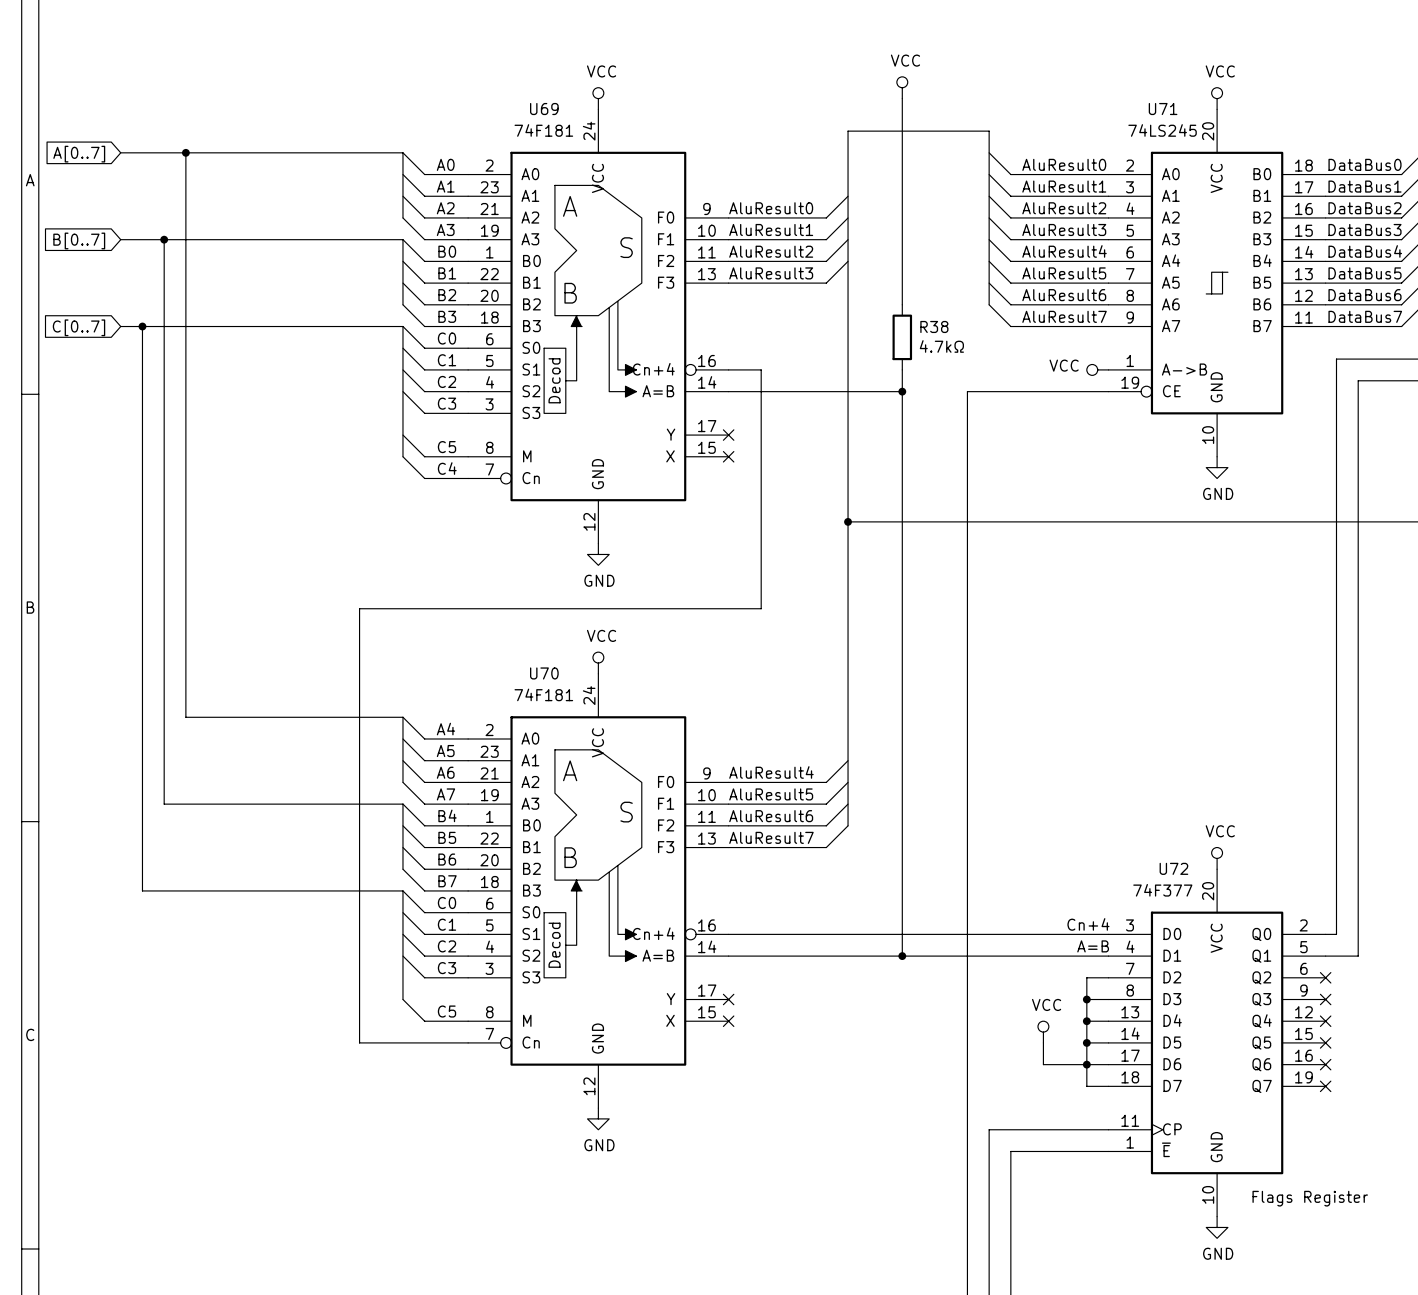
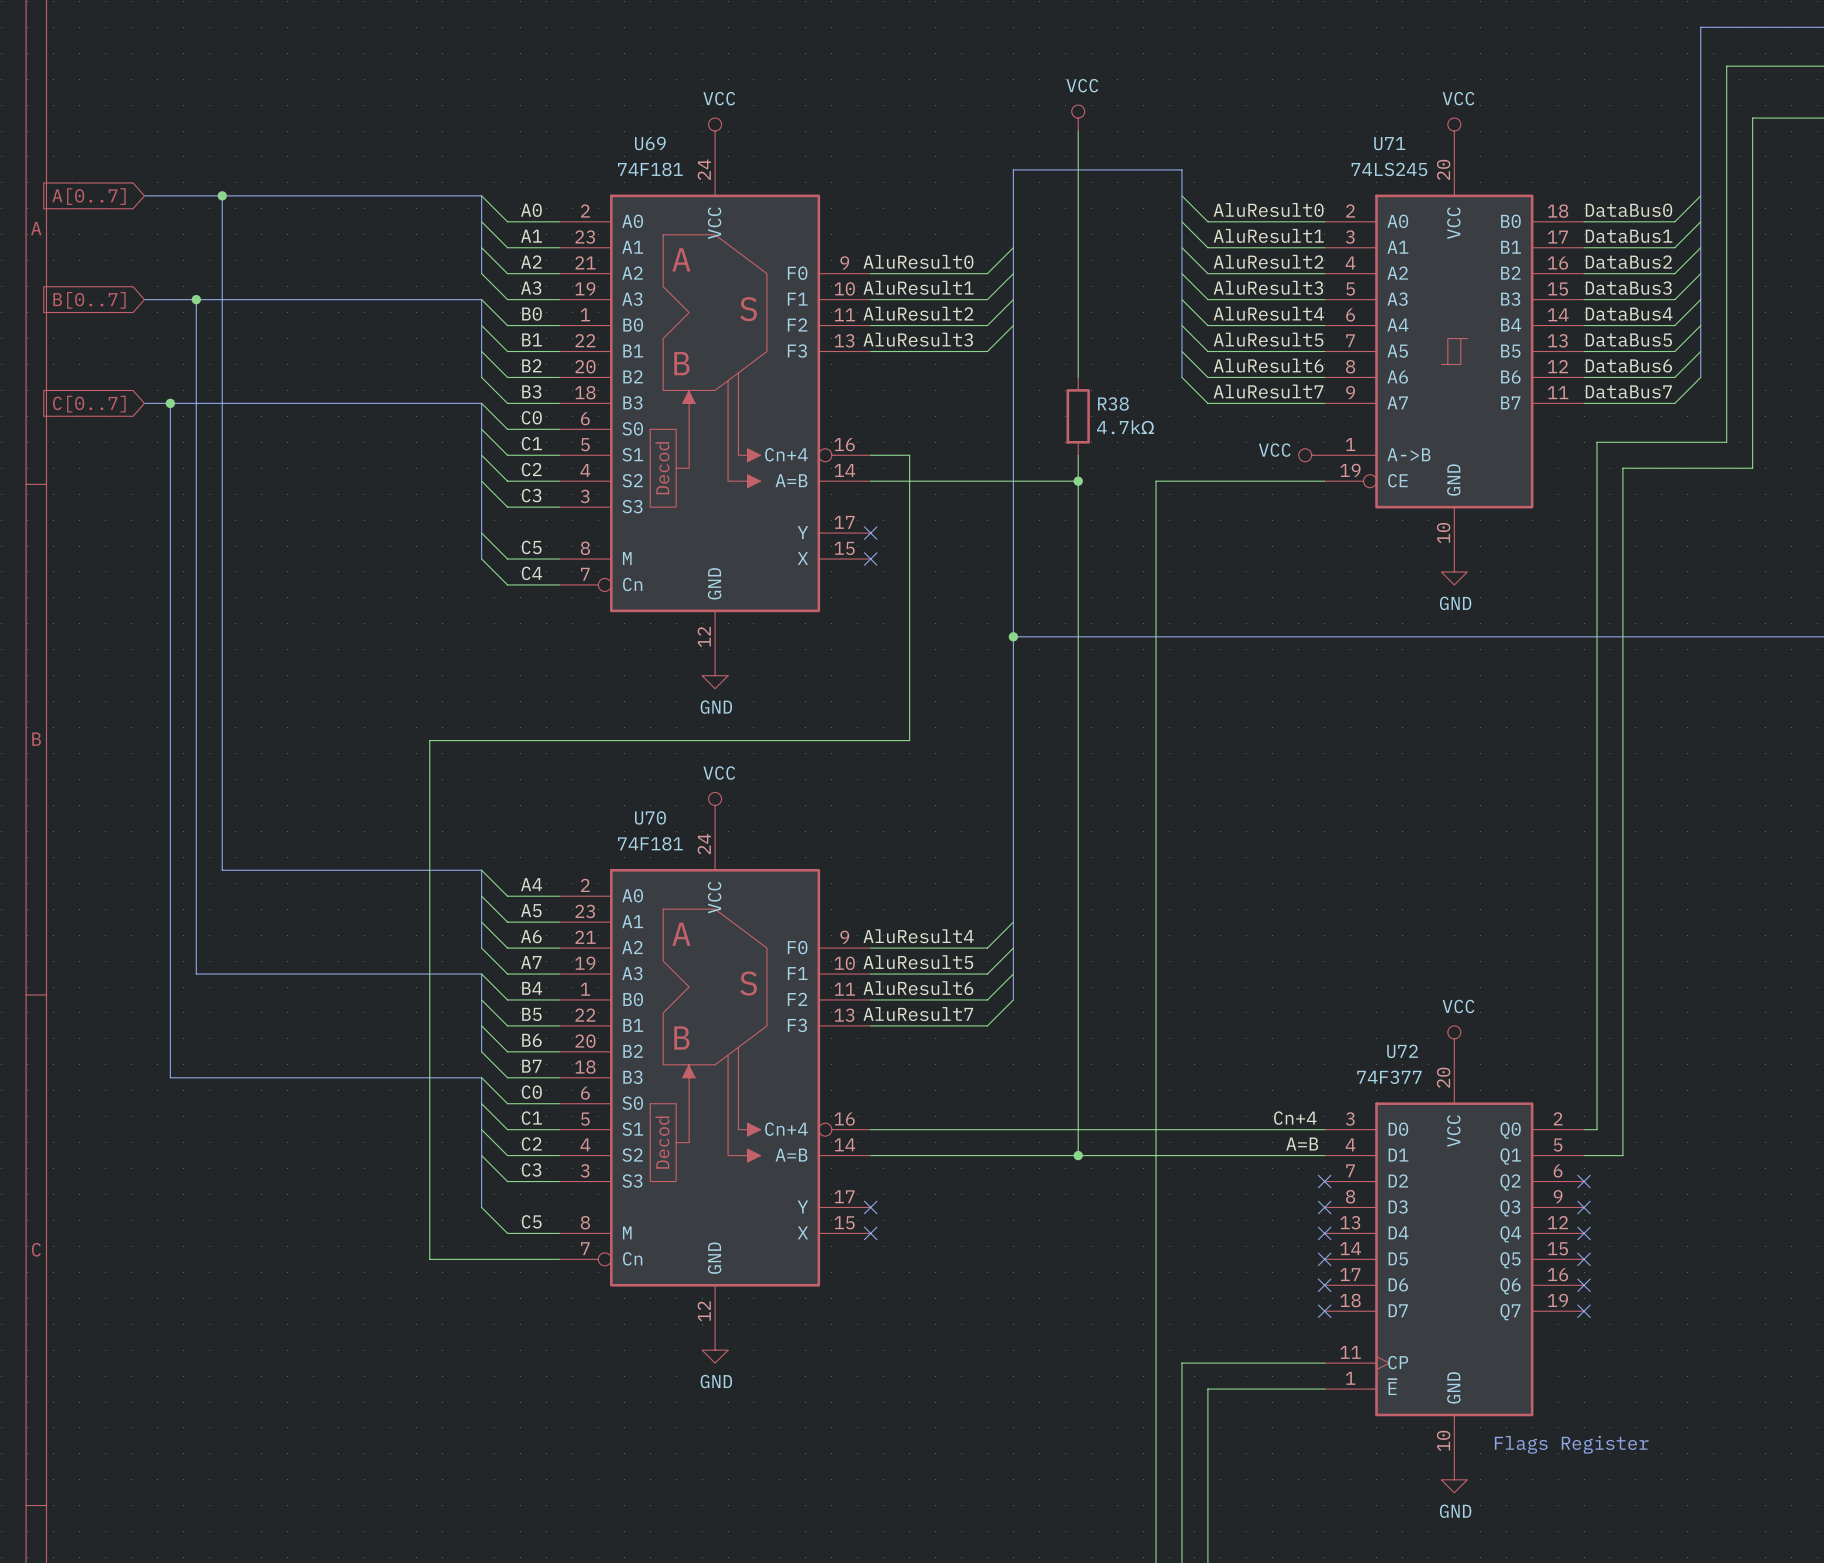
wire: (1108, 977) (1086, 977) (1086, 1086) (1108, 1086) -> none
no-connect mark: none -> (1324, 1181)
wire: (1086, 999) (1108, 999) -> none
junction: (1086, 999) -> none
no-connect mark: none -> (1324, 1207)
wire: (1086, 1021) (1108, 1021) -> none
junction: (1086, 1021) -> none
no-connect mark: none -> (1324, 1233)
power symbol: VCC (1043, 1032) -> none
wire: (1043, 1042) (1043, 1064) (1108, 1064) -> none
wire: (1086, 1042) (1108, 1042) -> none
junction: (1086, 1042) -> none
no-connect mark: none -> (1324, 1259)
junction: (1086, 1064) -> none
no-connect mark: none -> (1324, 1285)
no-connect mark: none -> (1324, 1311)

